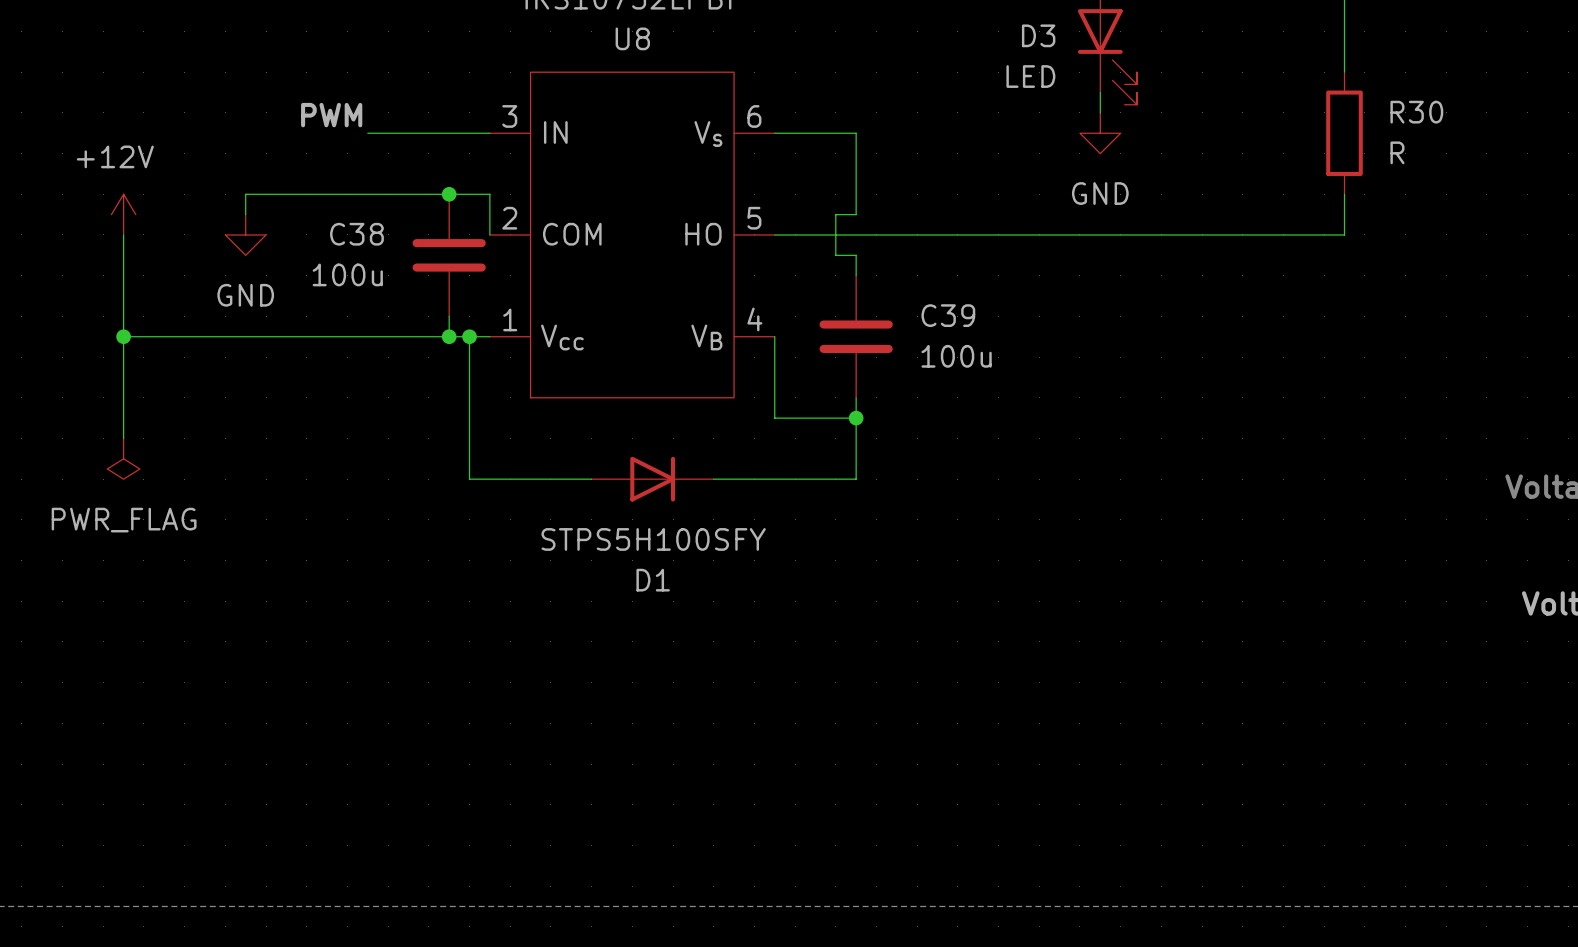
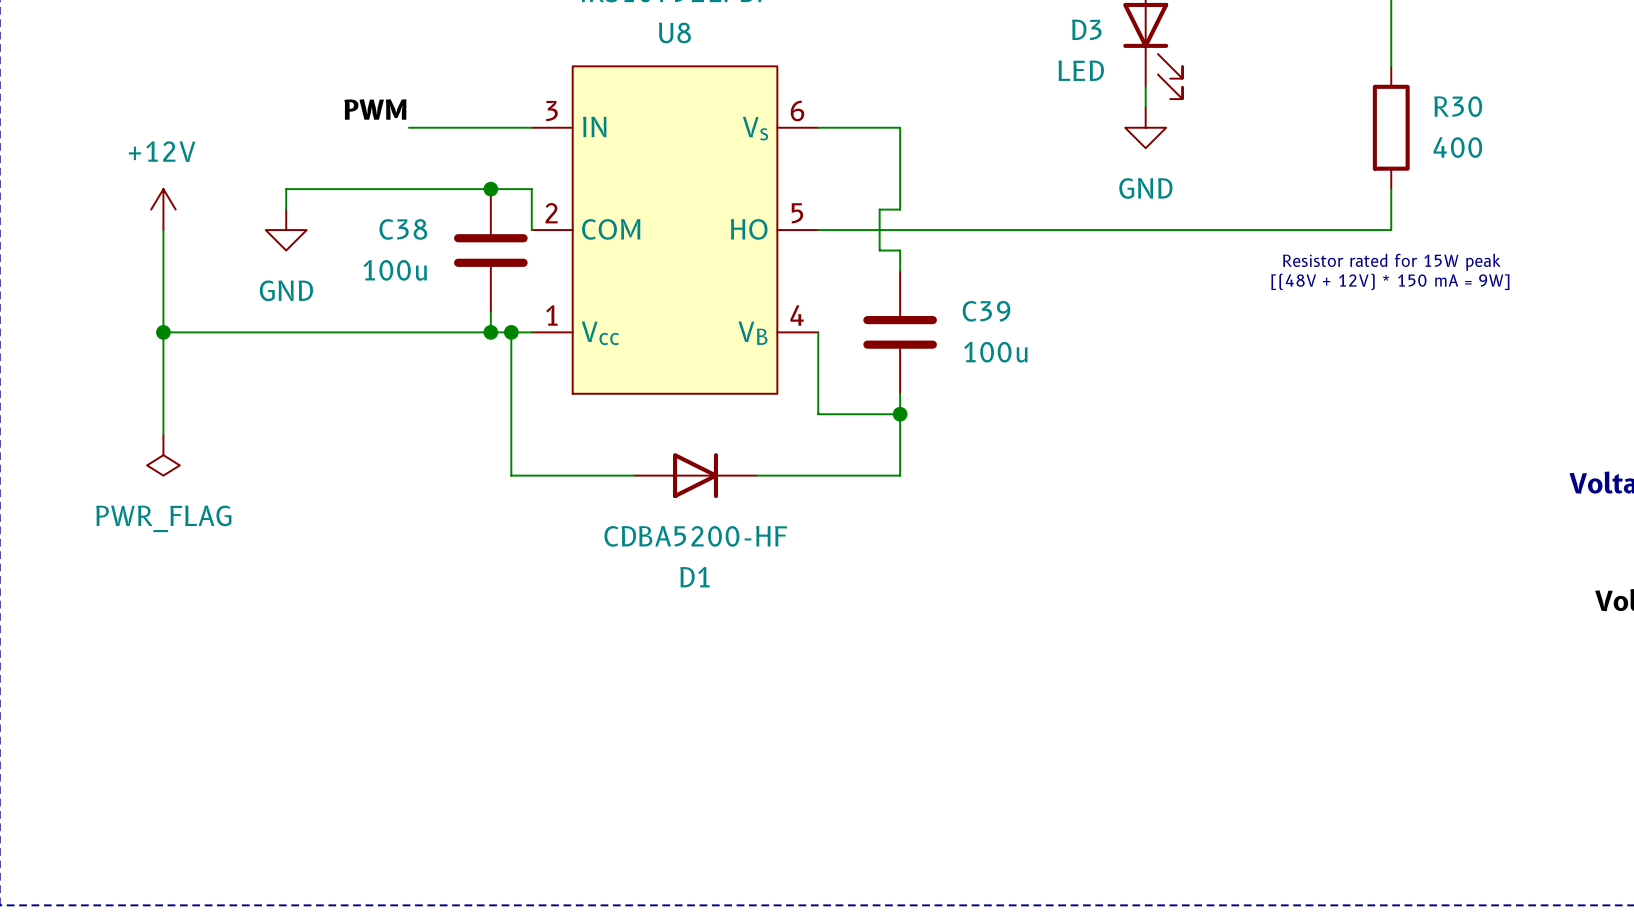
R30 value: R (1397, 152) -> 400 (1457, 147)
text: none -> Resistor rated for 15W peak (1391, 262)
text: none -> [(48V + 12V) * 150 mA = 9W] (1390, 281)
D1 value: STPS5H100SFY (653, 539) -> CDBA5200-HF (695, 536)

